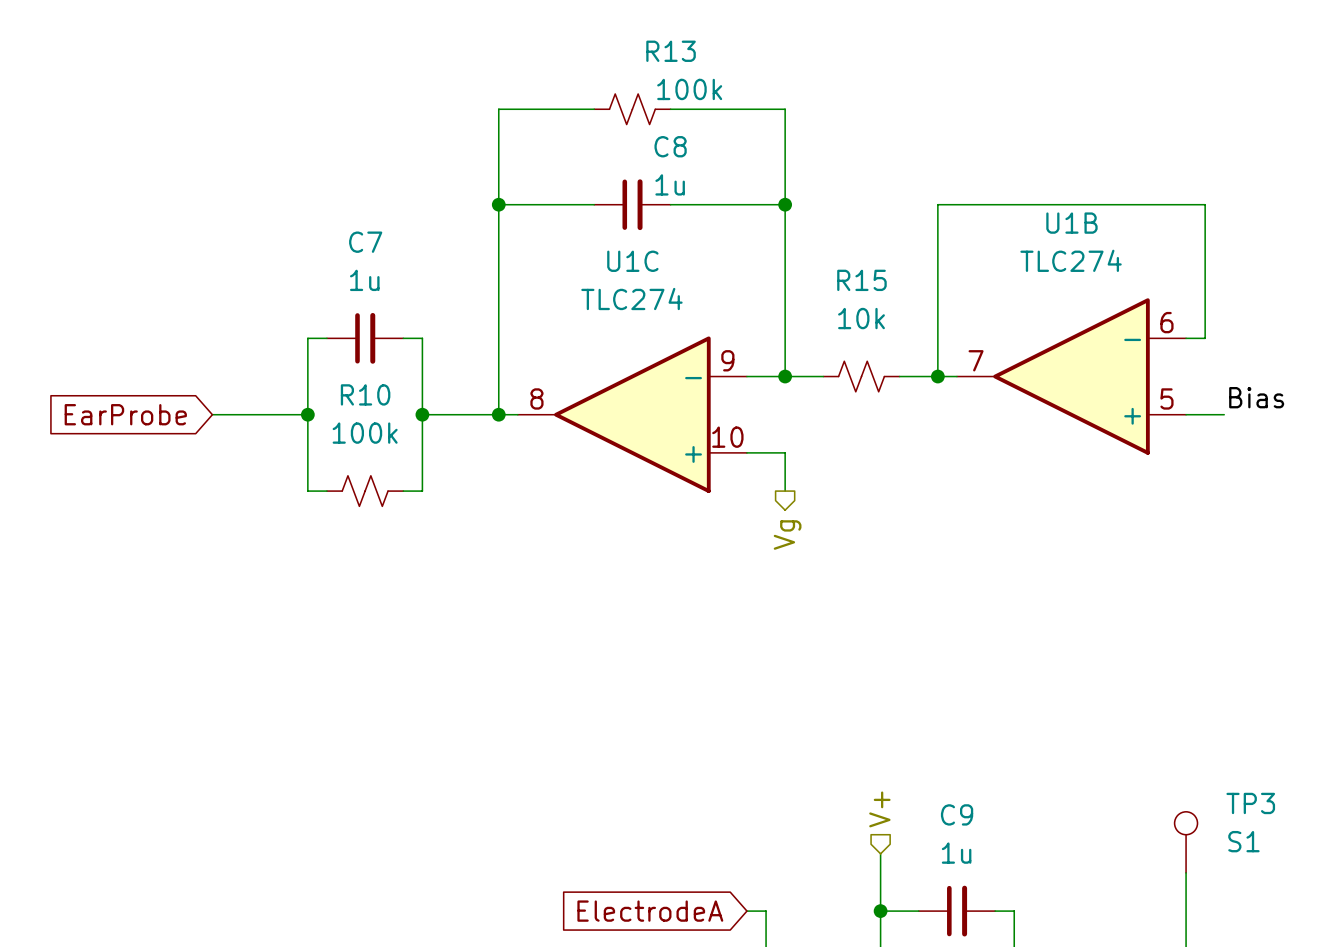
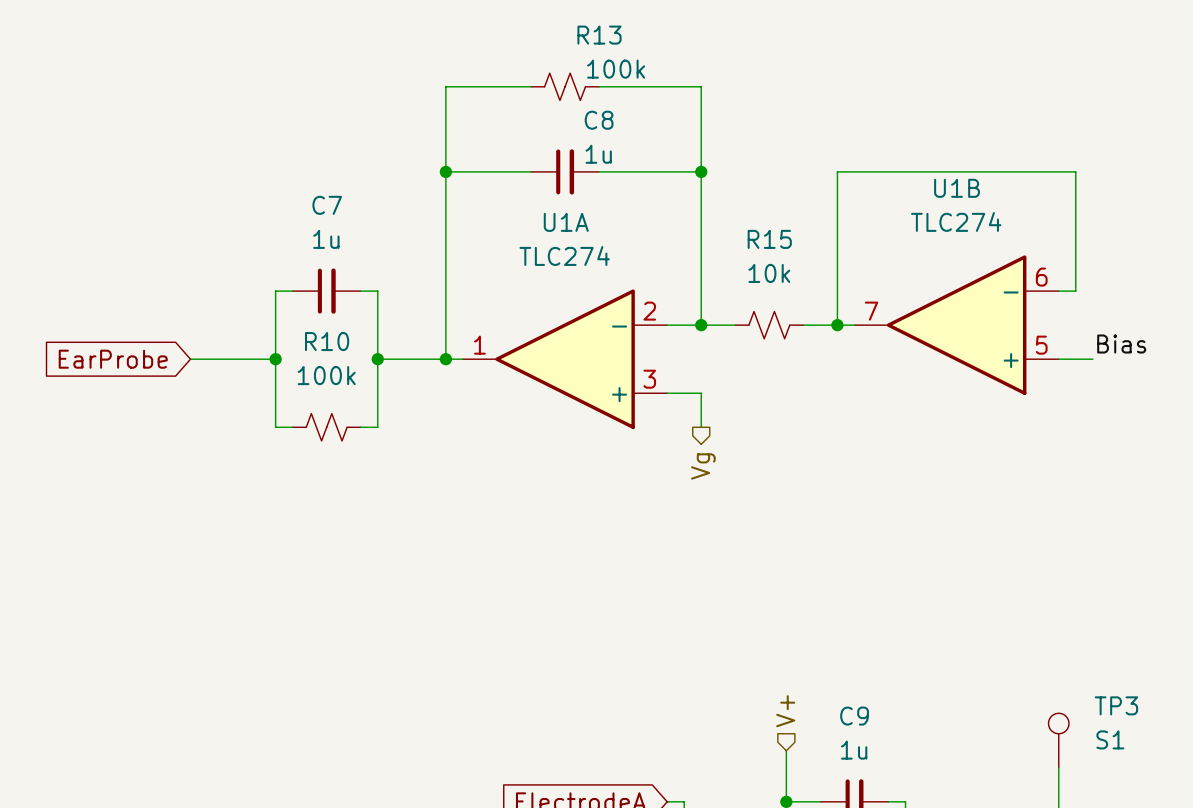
U1C name: U1C (632, 261) -> U1A (566, 222)
U1C pin number: 9 (727, 360) -> 2 (649, 311)
U1C pin number: 8 (536, 398) -> 1 (479, 345)
U1C pin number: 10 (727, 437) -> 3 (649, 379)

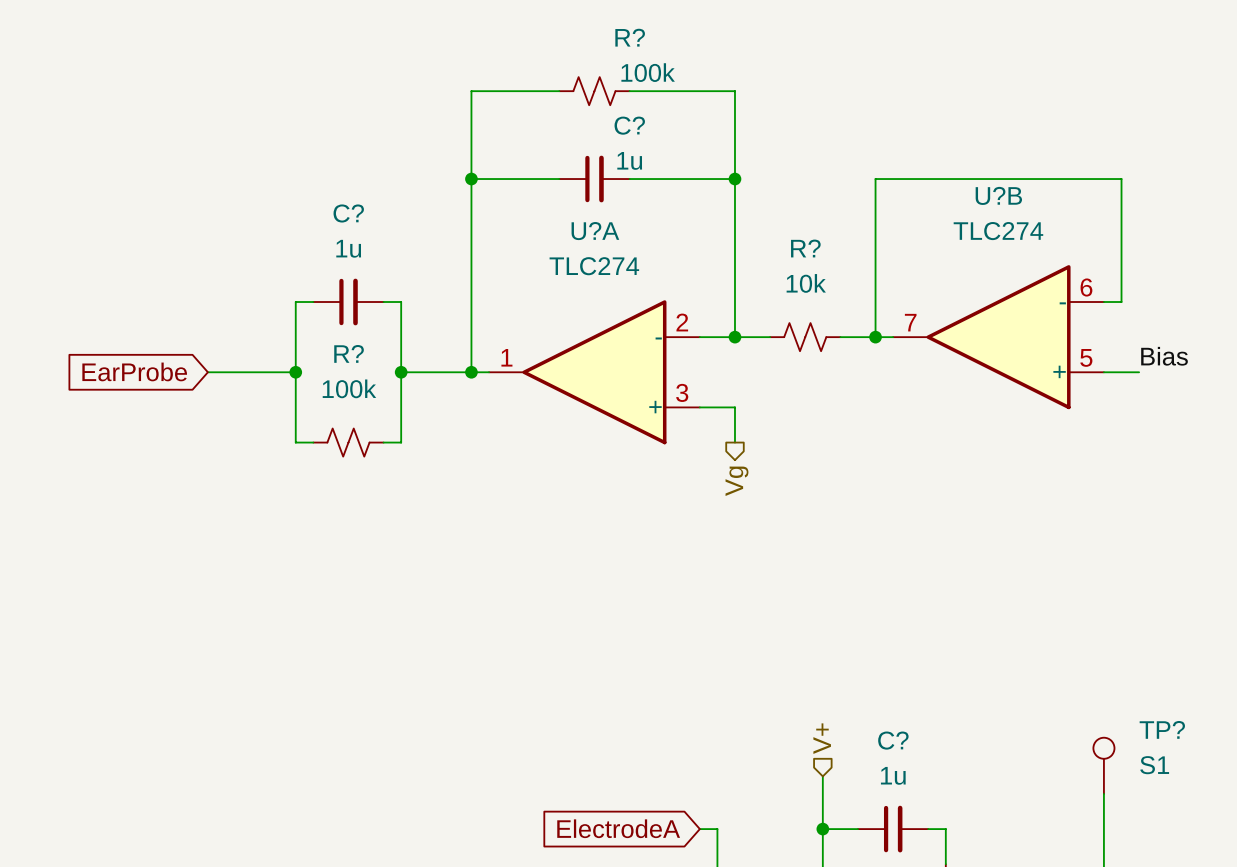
R13 name: R13 (599, 35) -> R? (630, 37)
C8 name: C8 (599, 120) -> C? (629, 125)
U1B name: U1B (957, 188) -> U?B (998, 195)
C7 name: C7 (327, 205) -> C? (348, 213)
U1A name: U1A (566, 222) -> U?A (595, 231)
R15 name: R15 (769, 239) -> R? (805, 248)
R10 name: R10 (327, 341) -> R? (349, 353)
TP3 name: TP3 (1116, 705) -> TP? (1162, 729)
C9 name: C9 (854, 716) -> C? (893, 740)

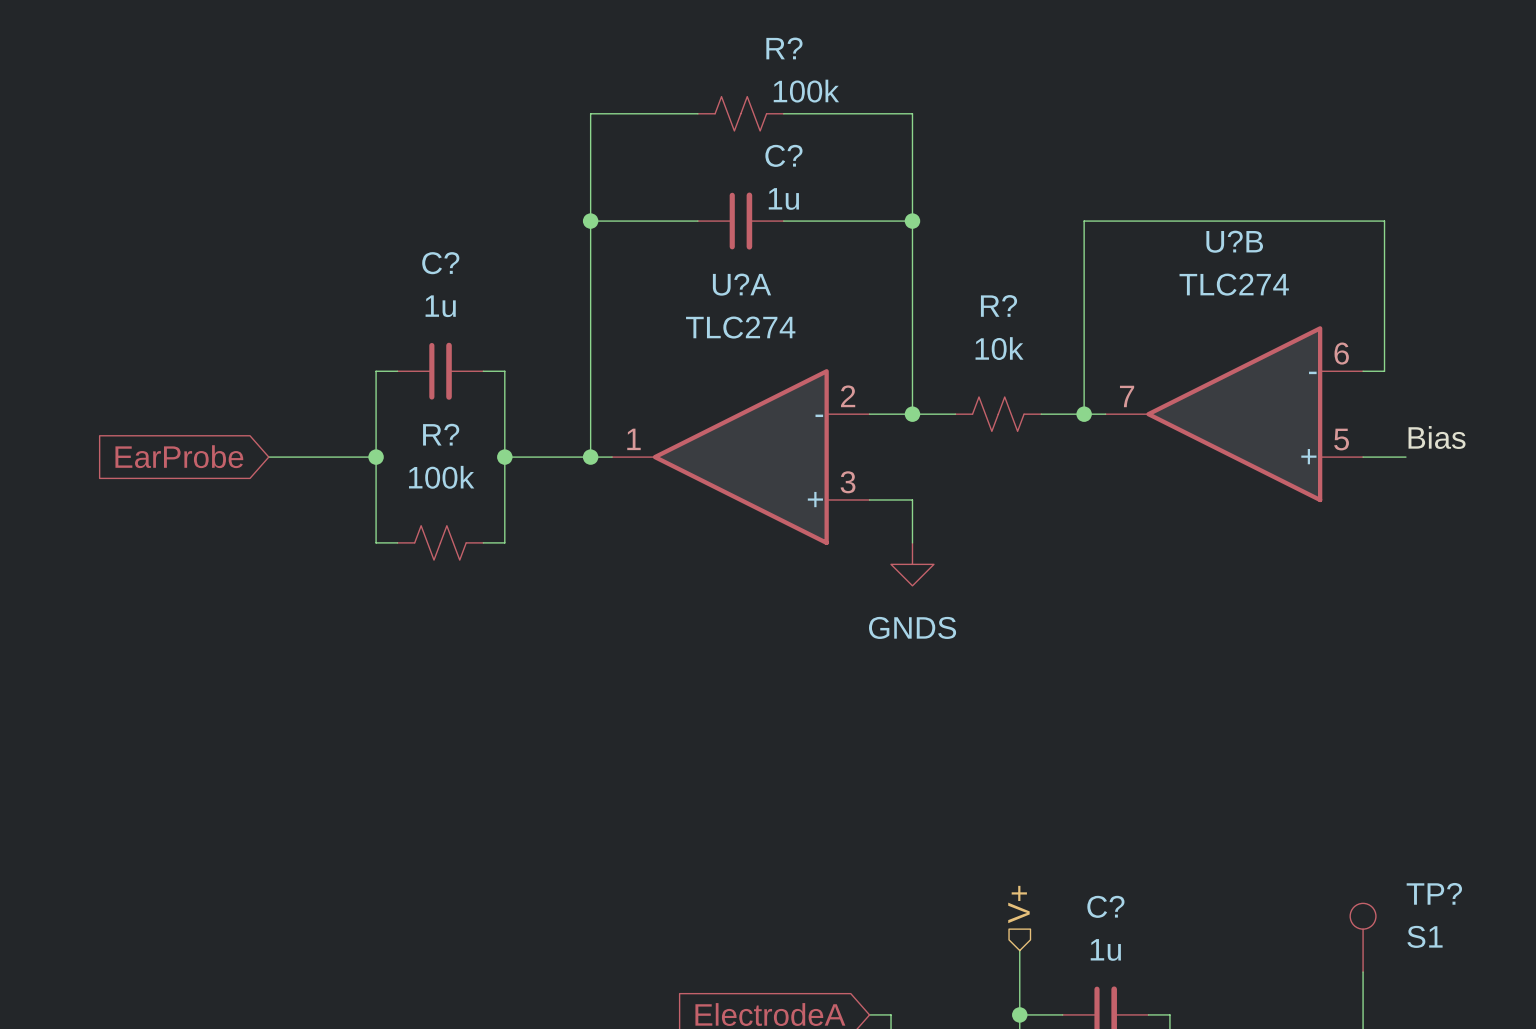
power symbol: none -> GNDS (912, 564)
hierarchical label: Vg (736, 481) -> none

